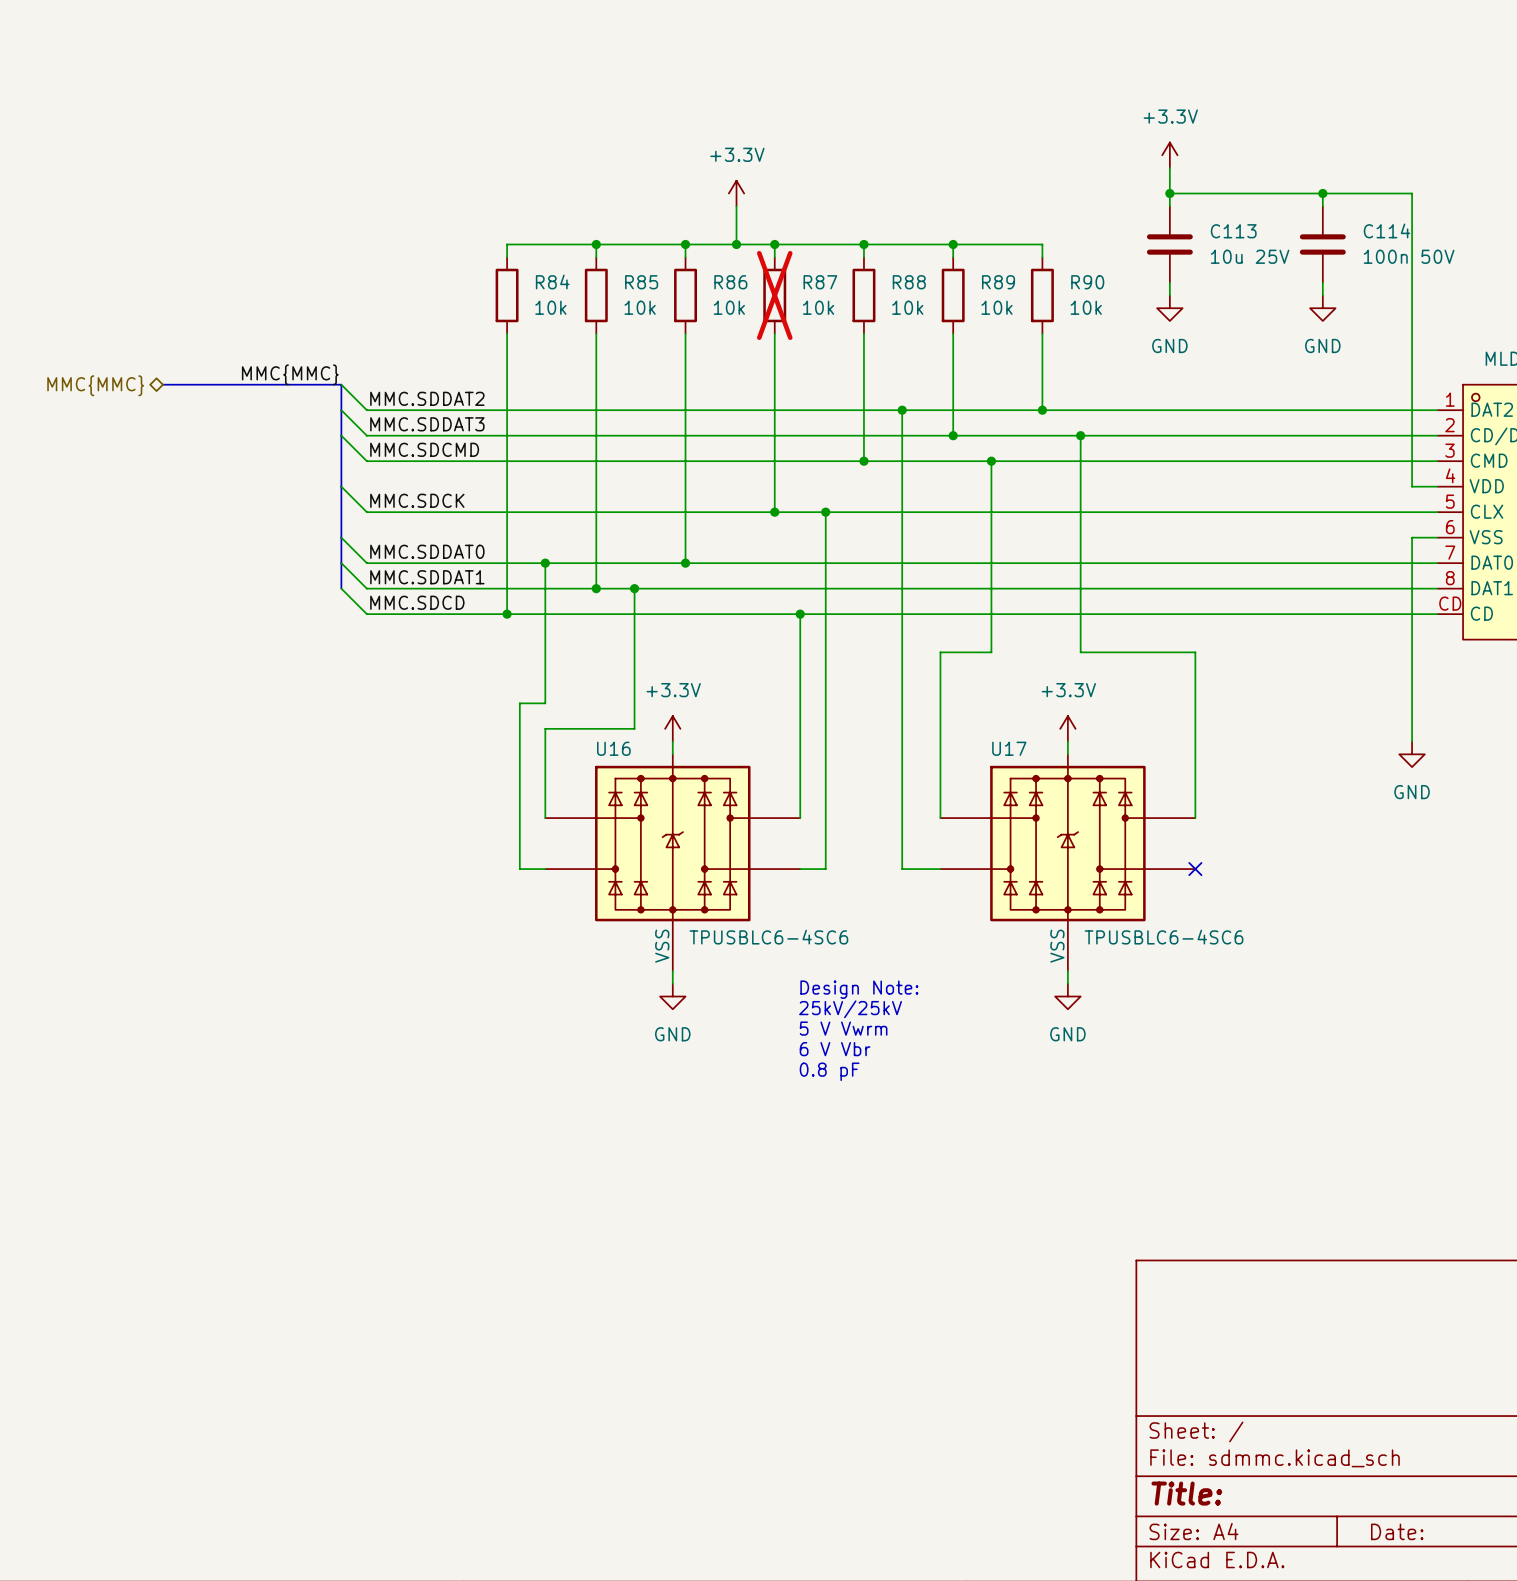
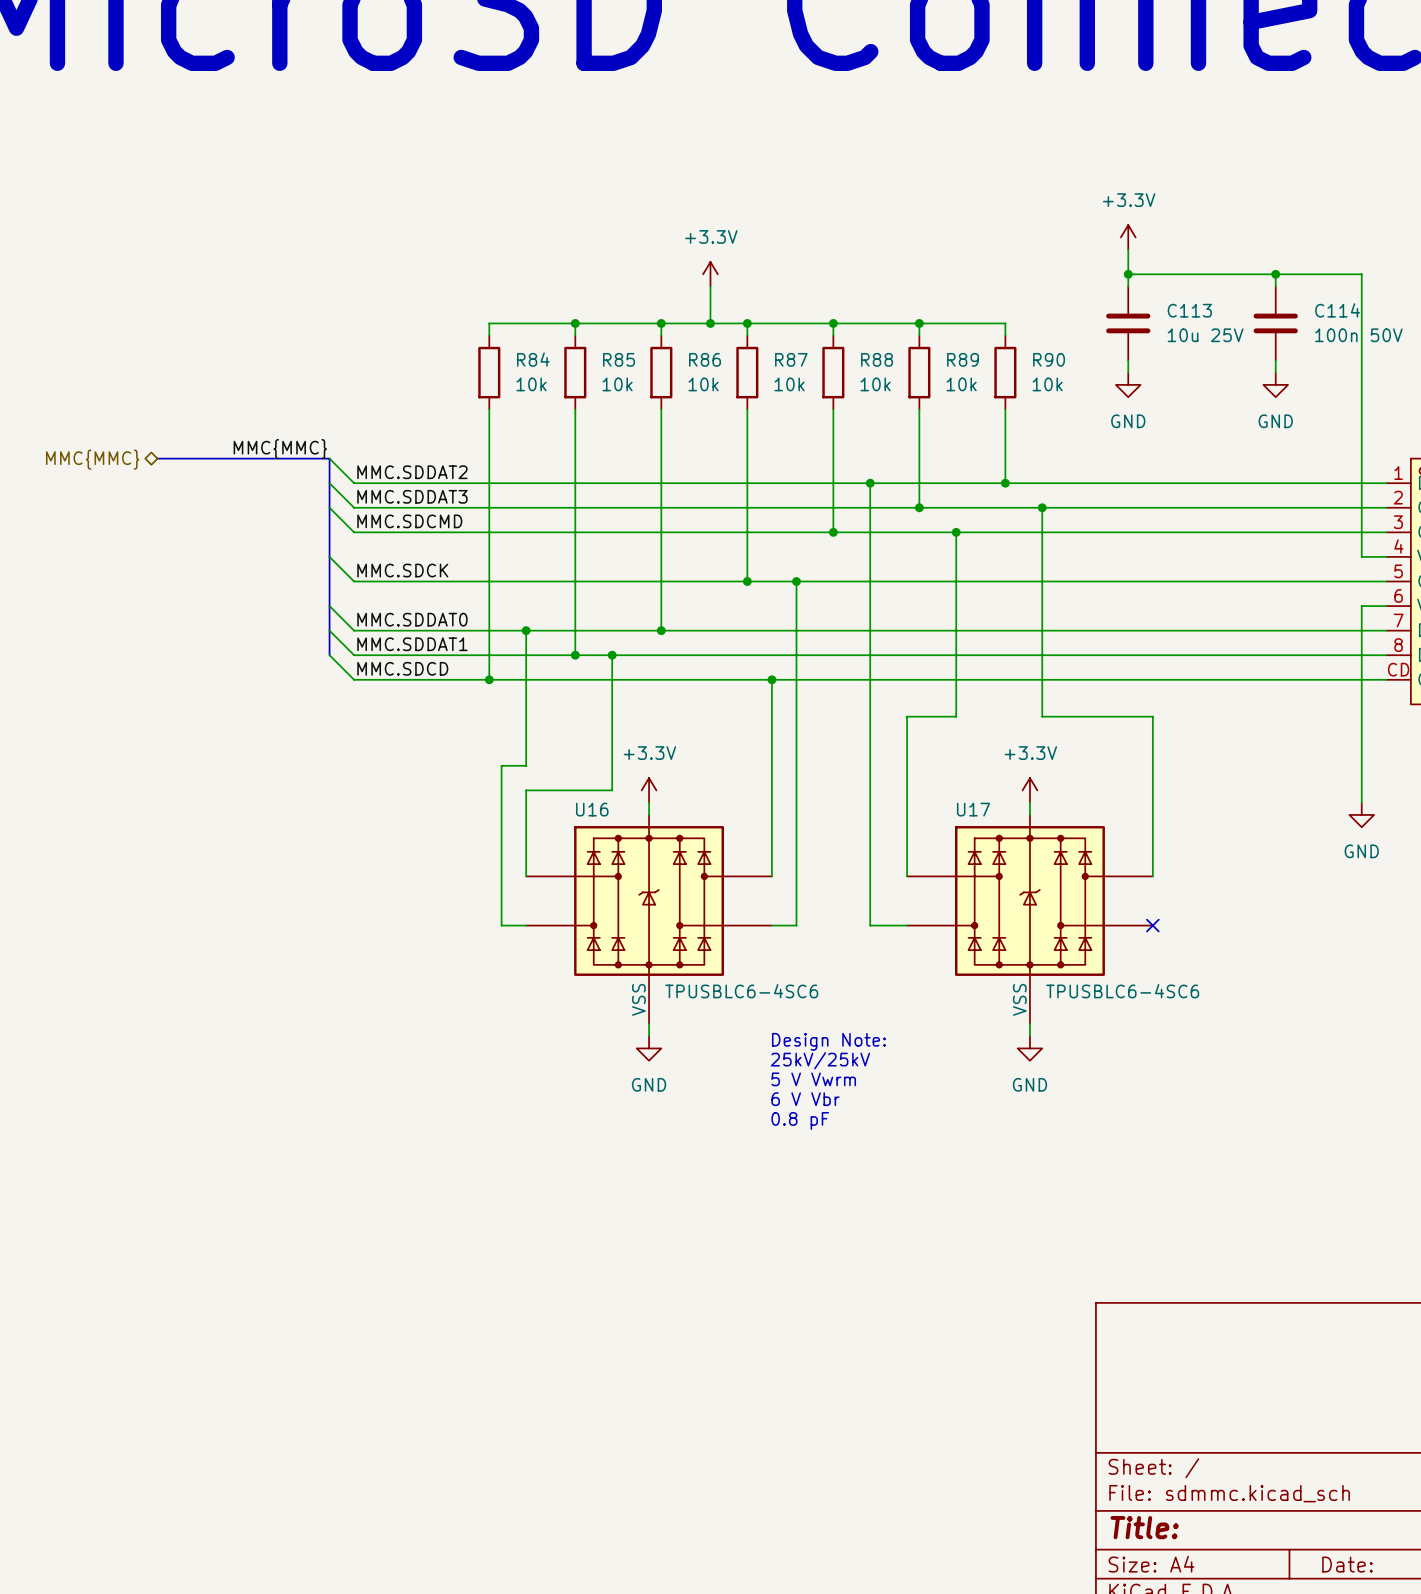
R87 do-not-place cross: (774, 295) -> none

